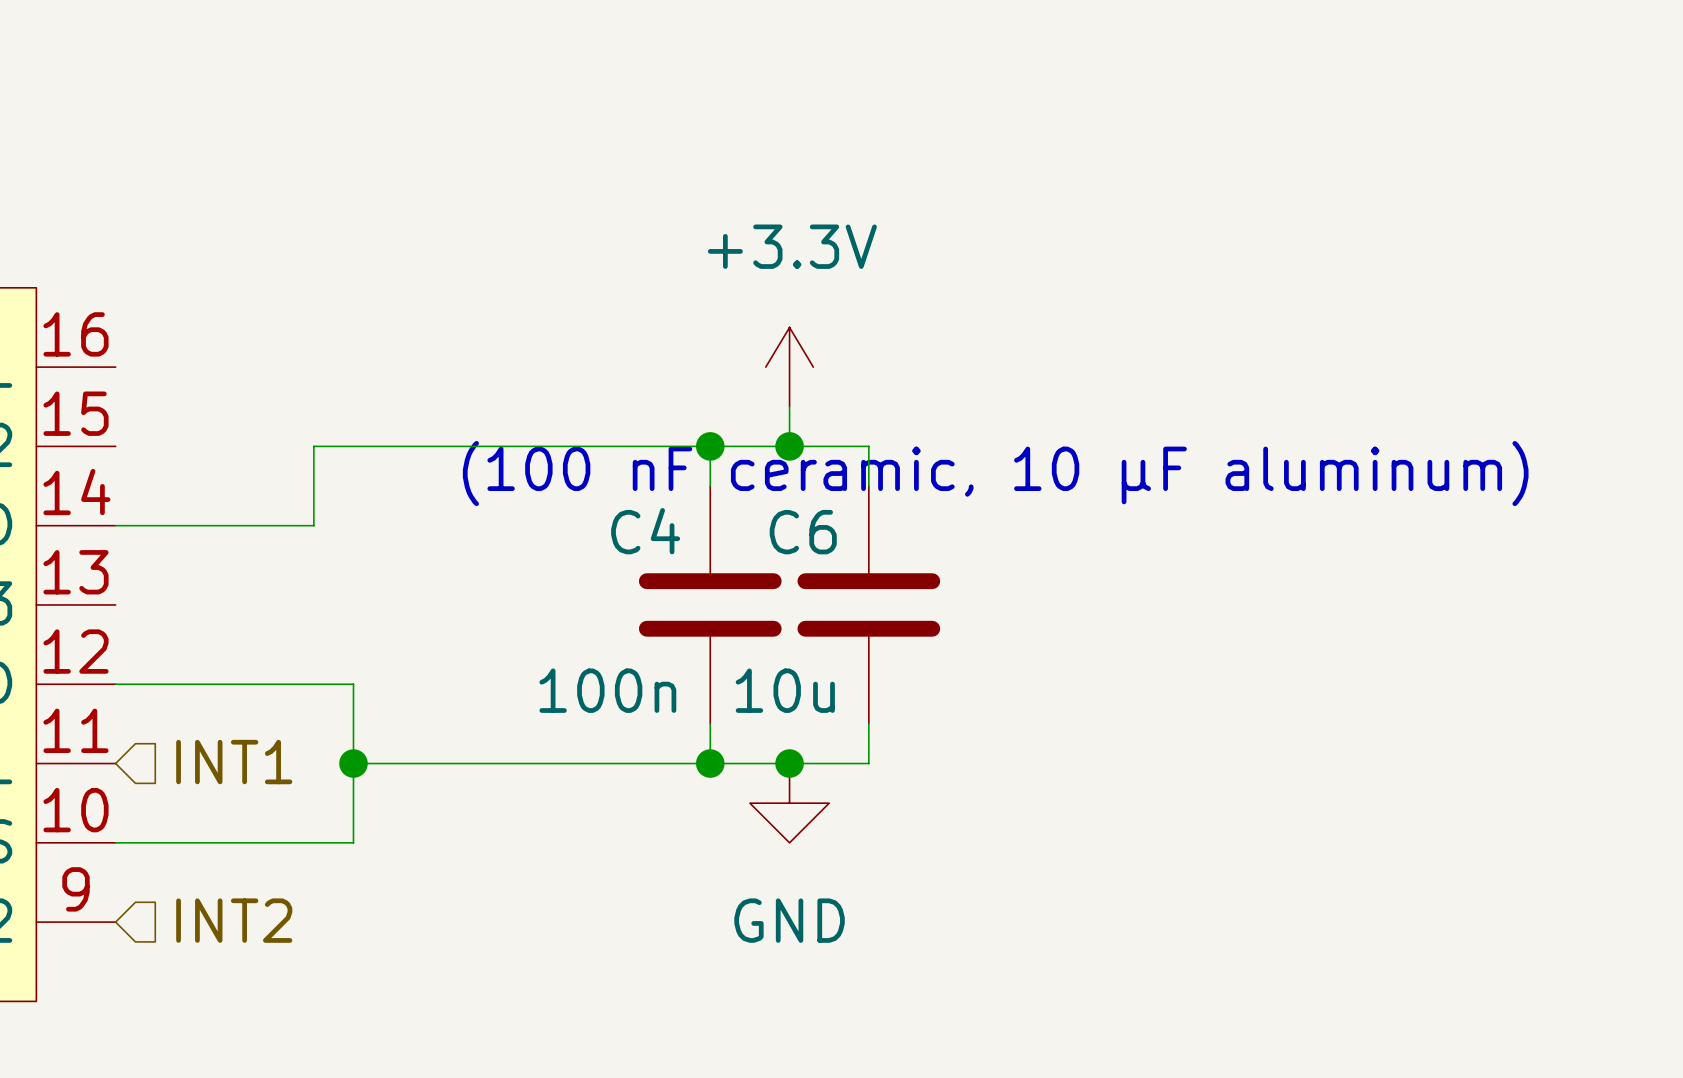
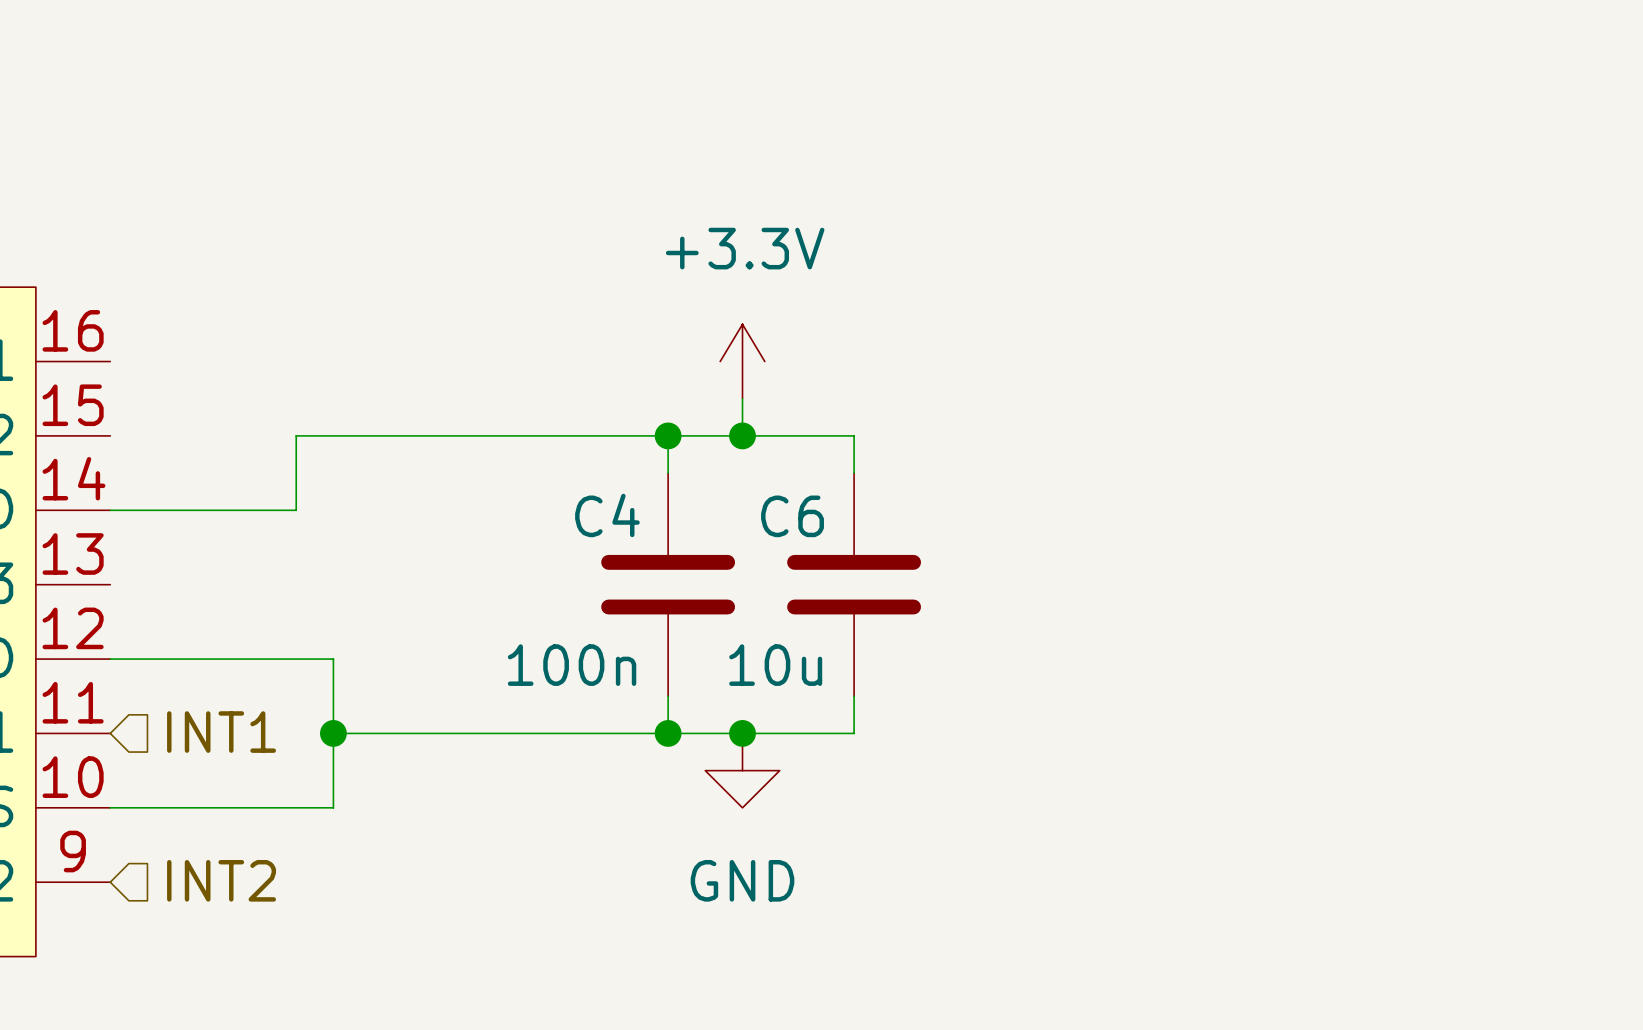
wire: (868, 446) (868, 486) -> (816, 435) (854, 435) (854, 473)
text: (100 nF ceramic, 10 μF aluminum) (995, 473) -> none
C6 position: (868, 604) -> (854, 584)
wire: (868, 723) (868, 763) -> (854, 696) (854, 733) (816, 733)

